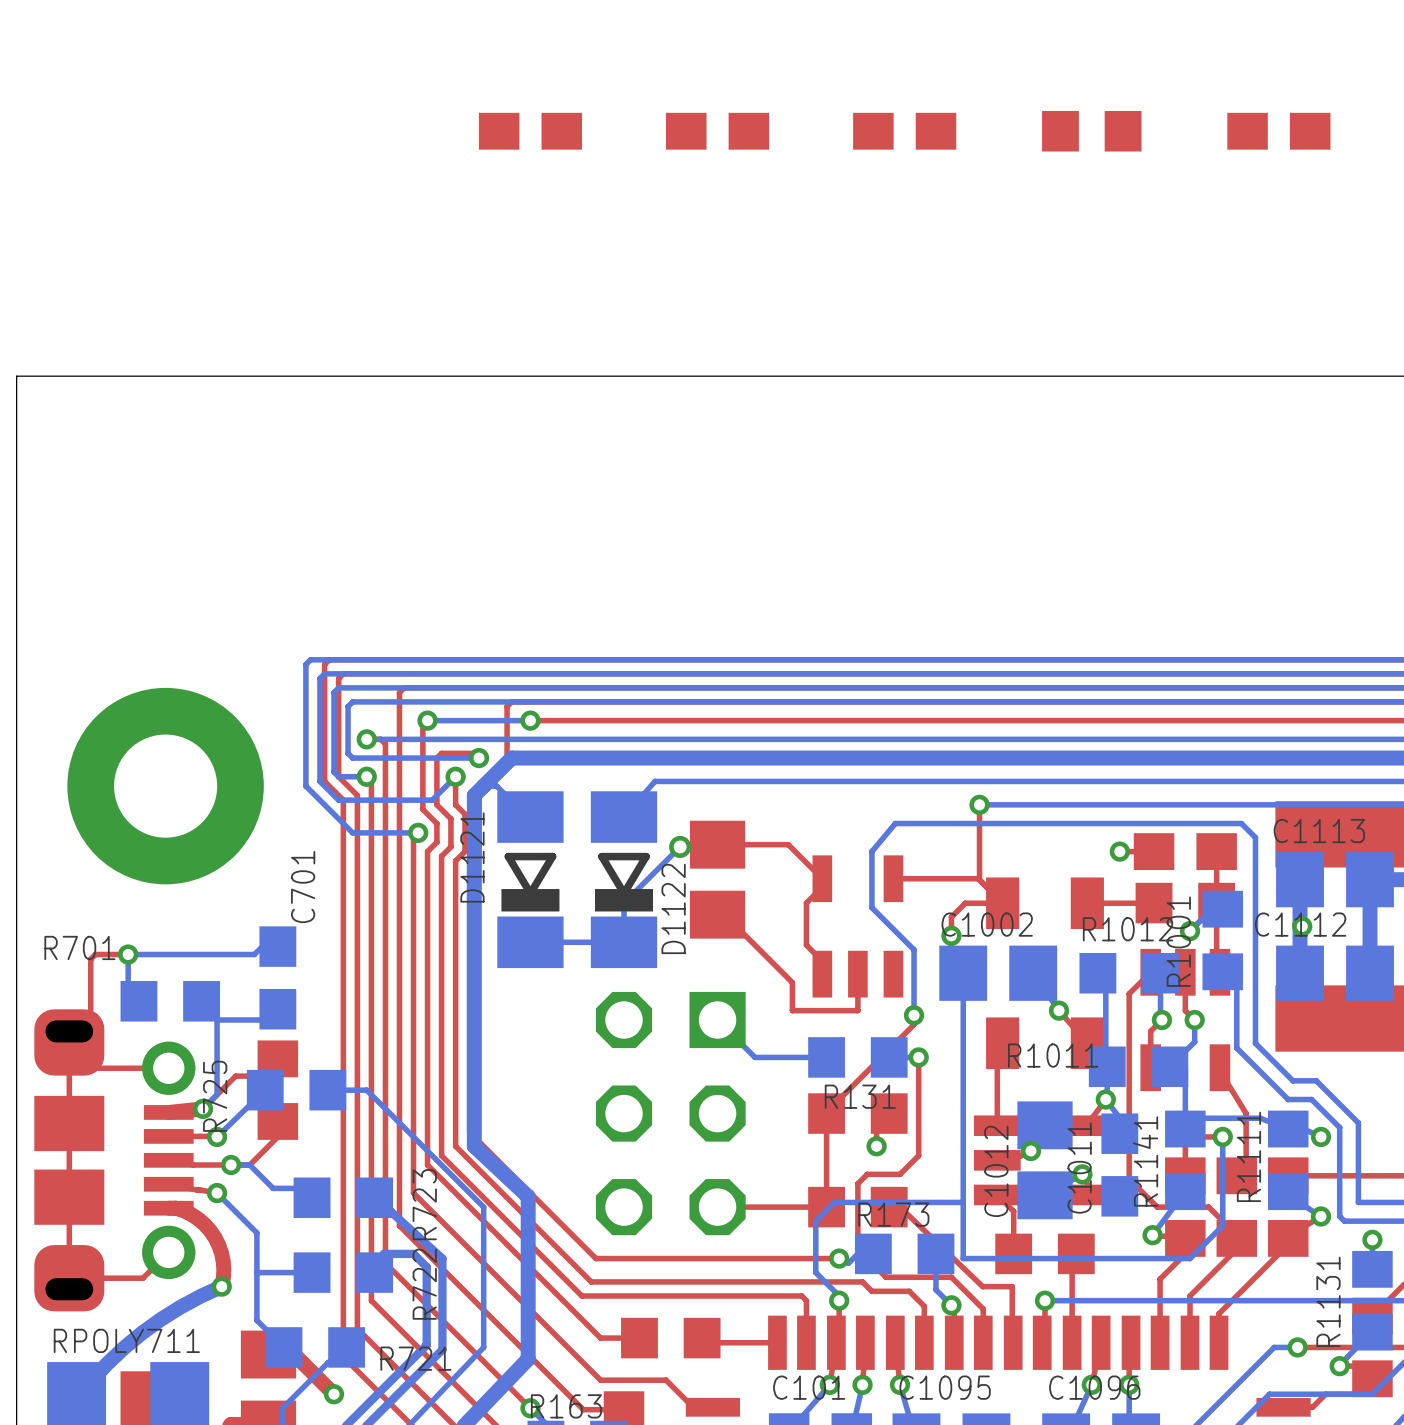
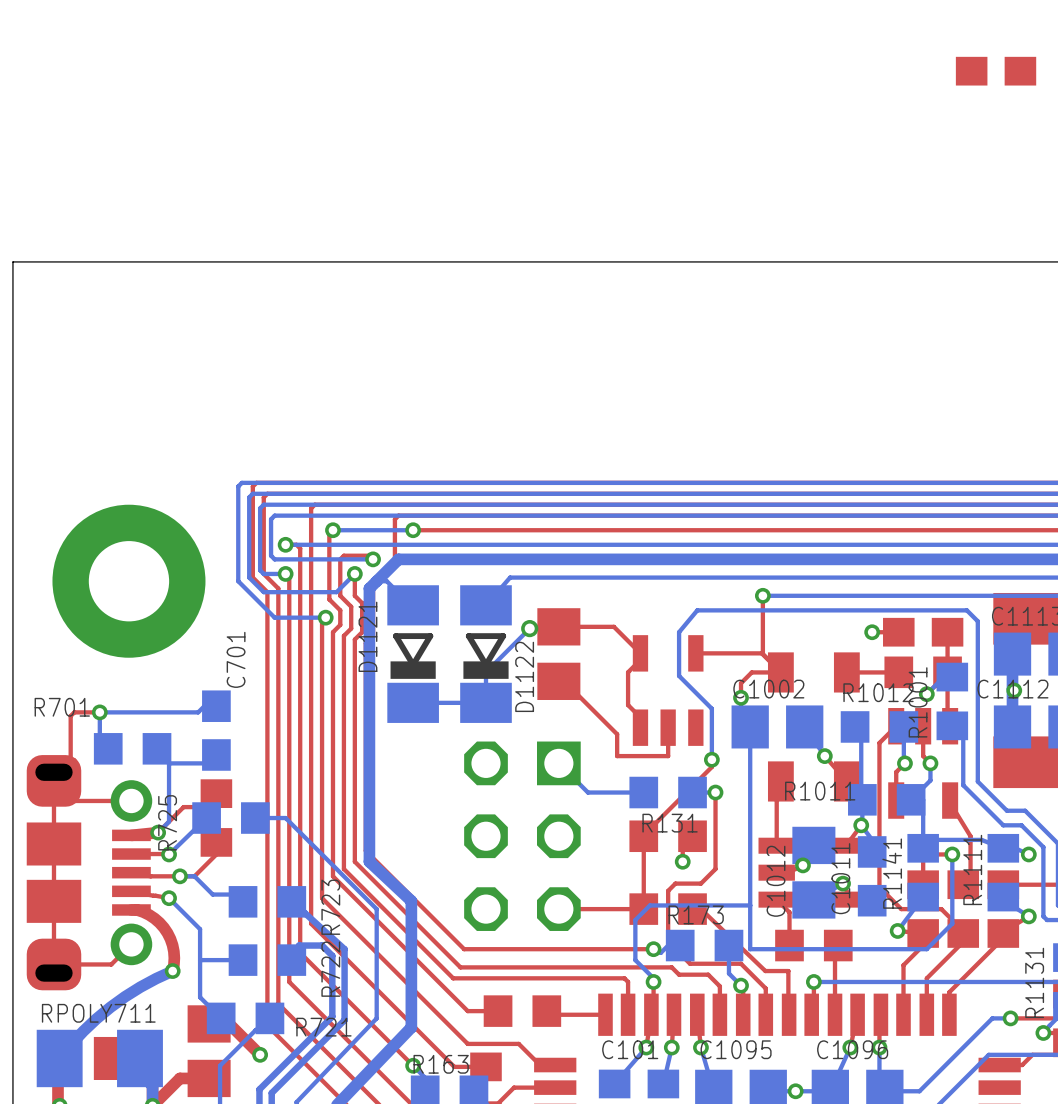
part: (530, 131) -> none
part: (717, 131) -> none
part: (904, 131) -> none
part: (1091, 131) -> none

